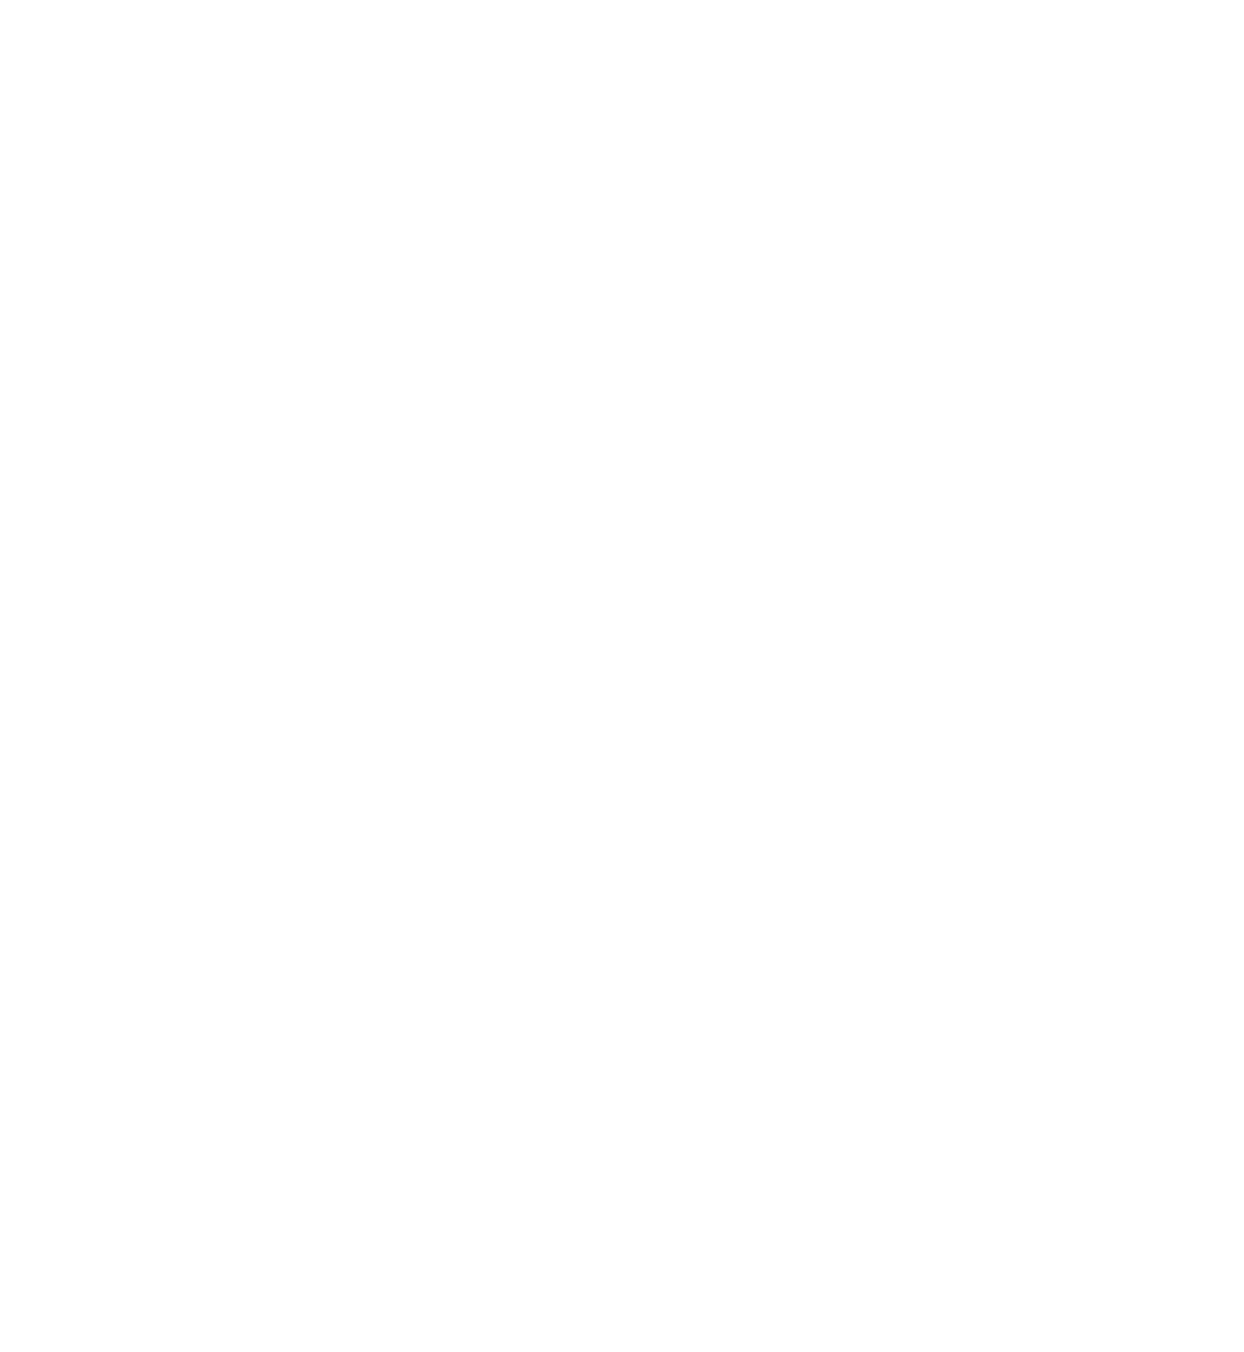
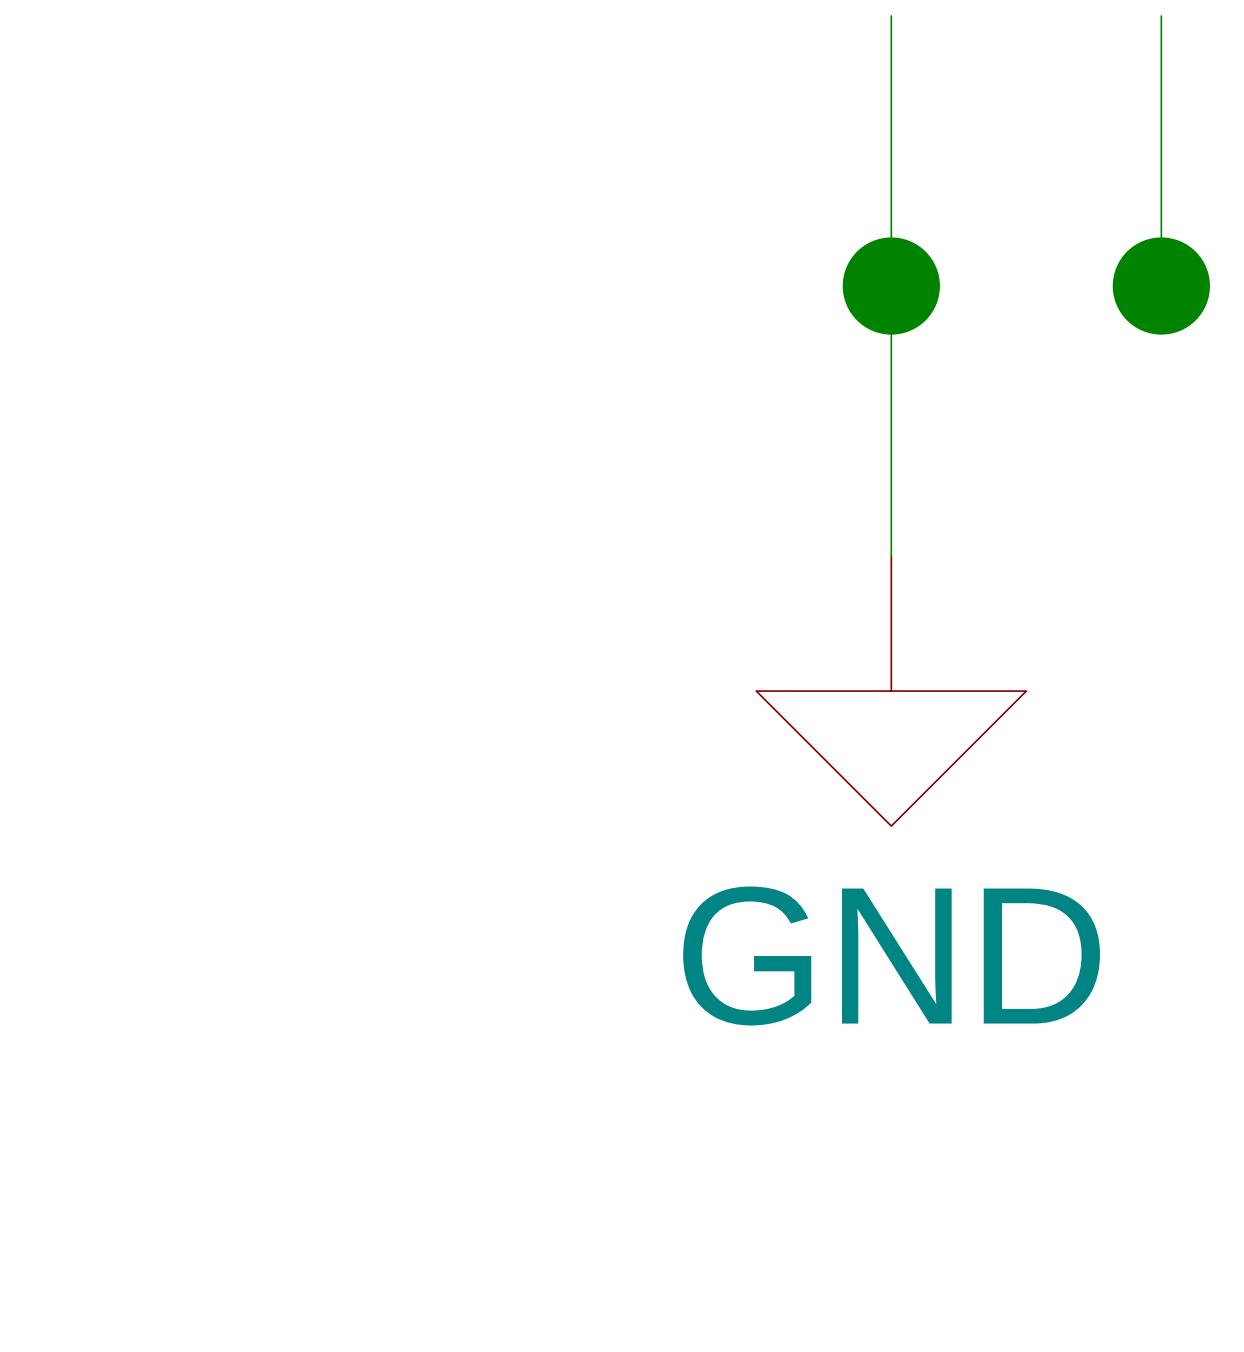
wire: none -> (891, 15) (891, 556)
wire: none -> (1161, 15) (1161, 286)
junction: none -> (891, 286)
junction: none -> (1161, 286)
power symbol: none -> GND (891, 691)

